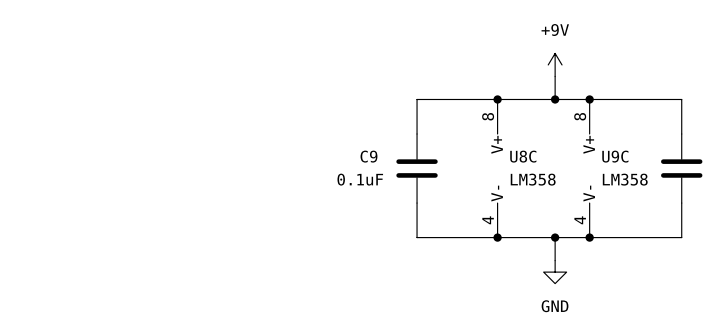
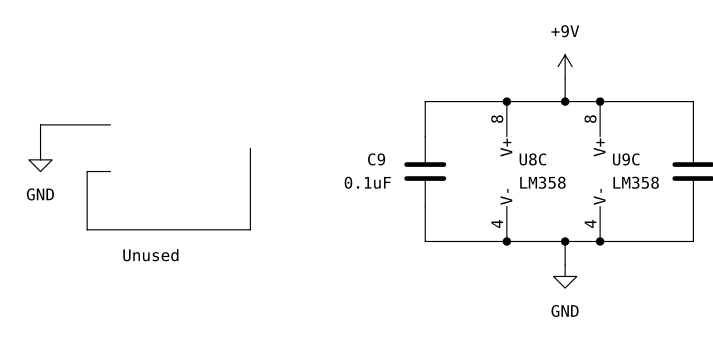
wire: none -> (110, 124) (40, 124) (40, 148)
wire: none -> (250, 148) (250, 229) (87, 229) (87, 171) (110, 171)
power symbol: none -> GND (40, 159)
text: none -> Unused (150, 255)

